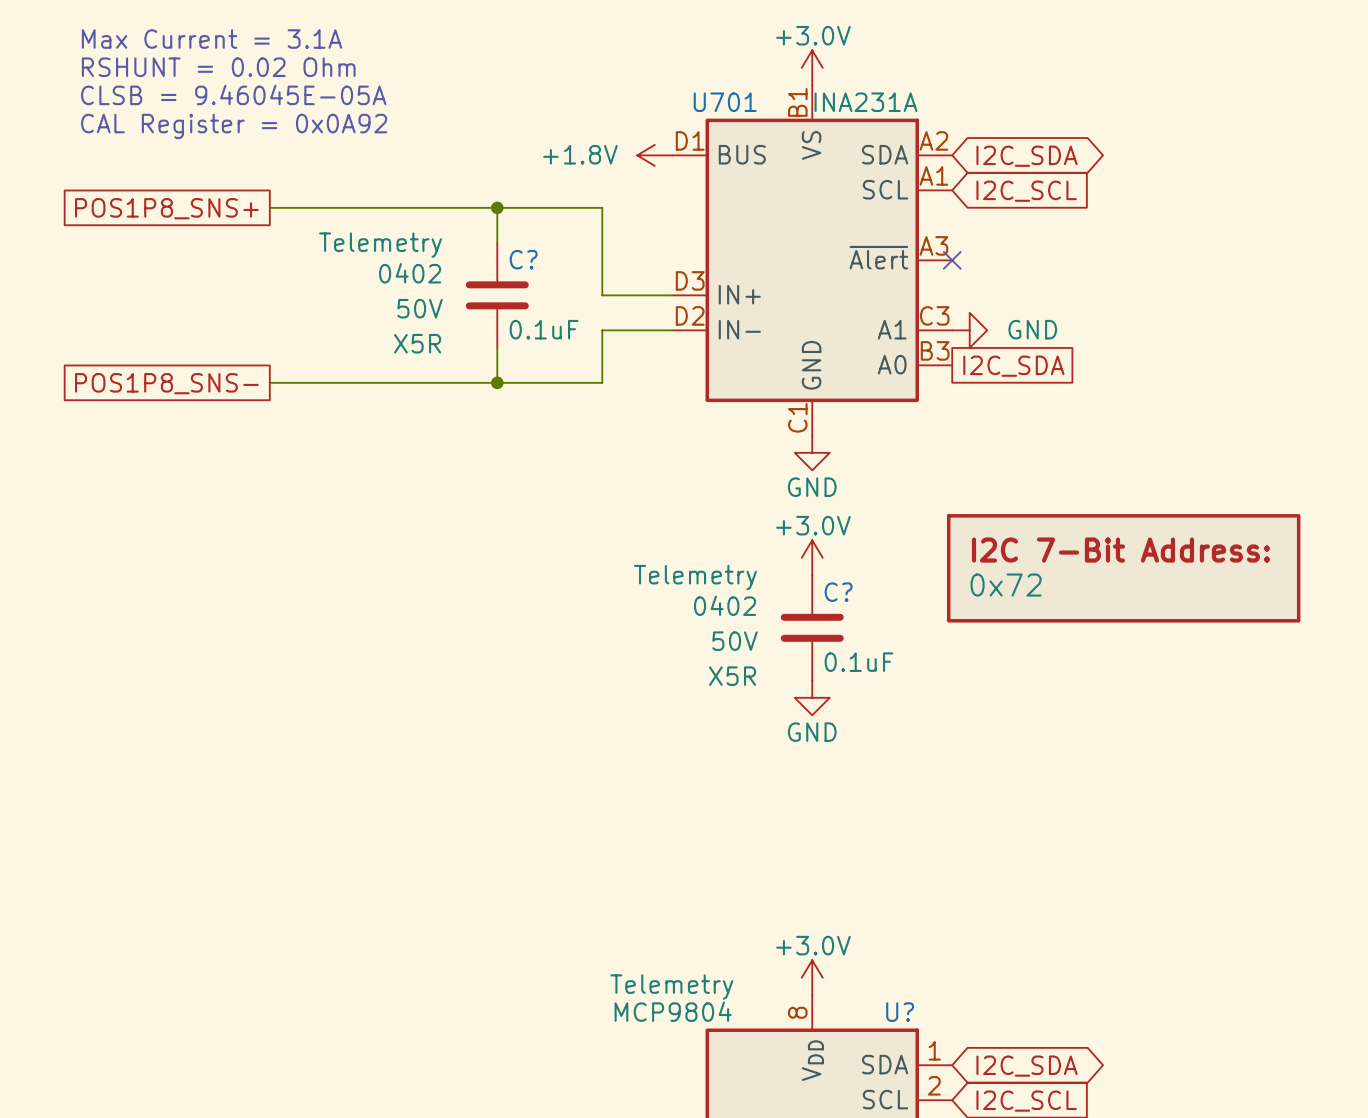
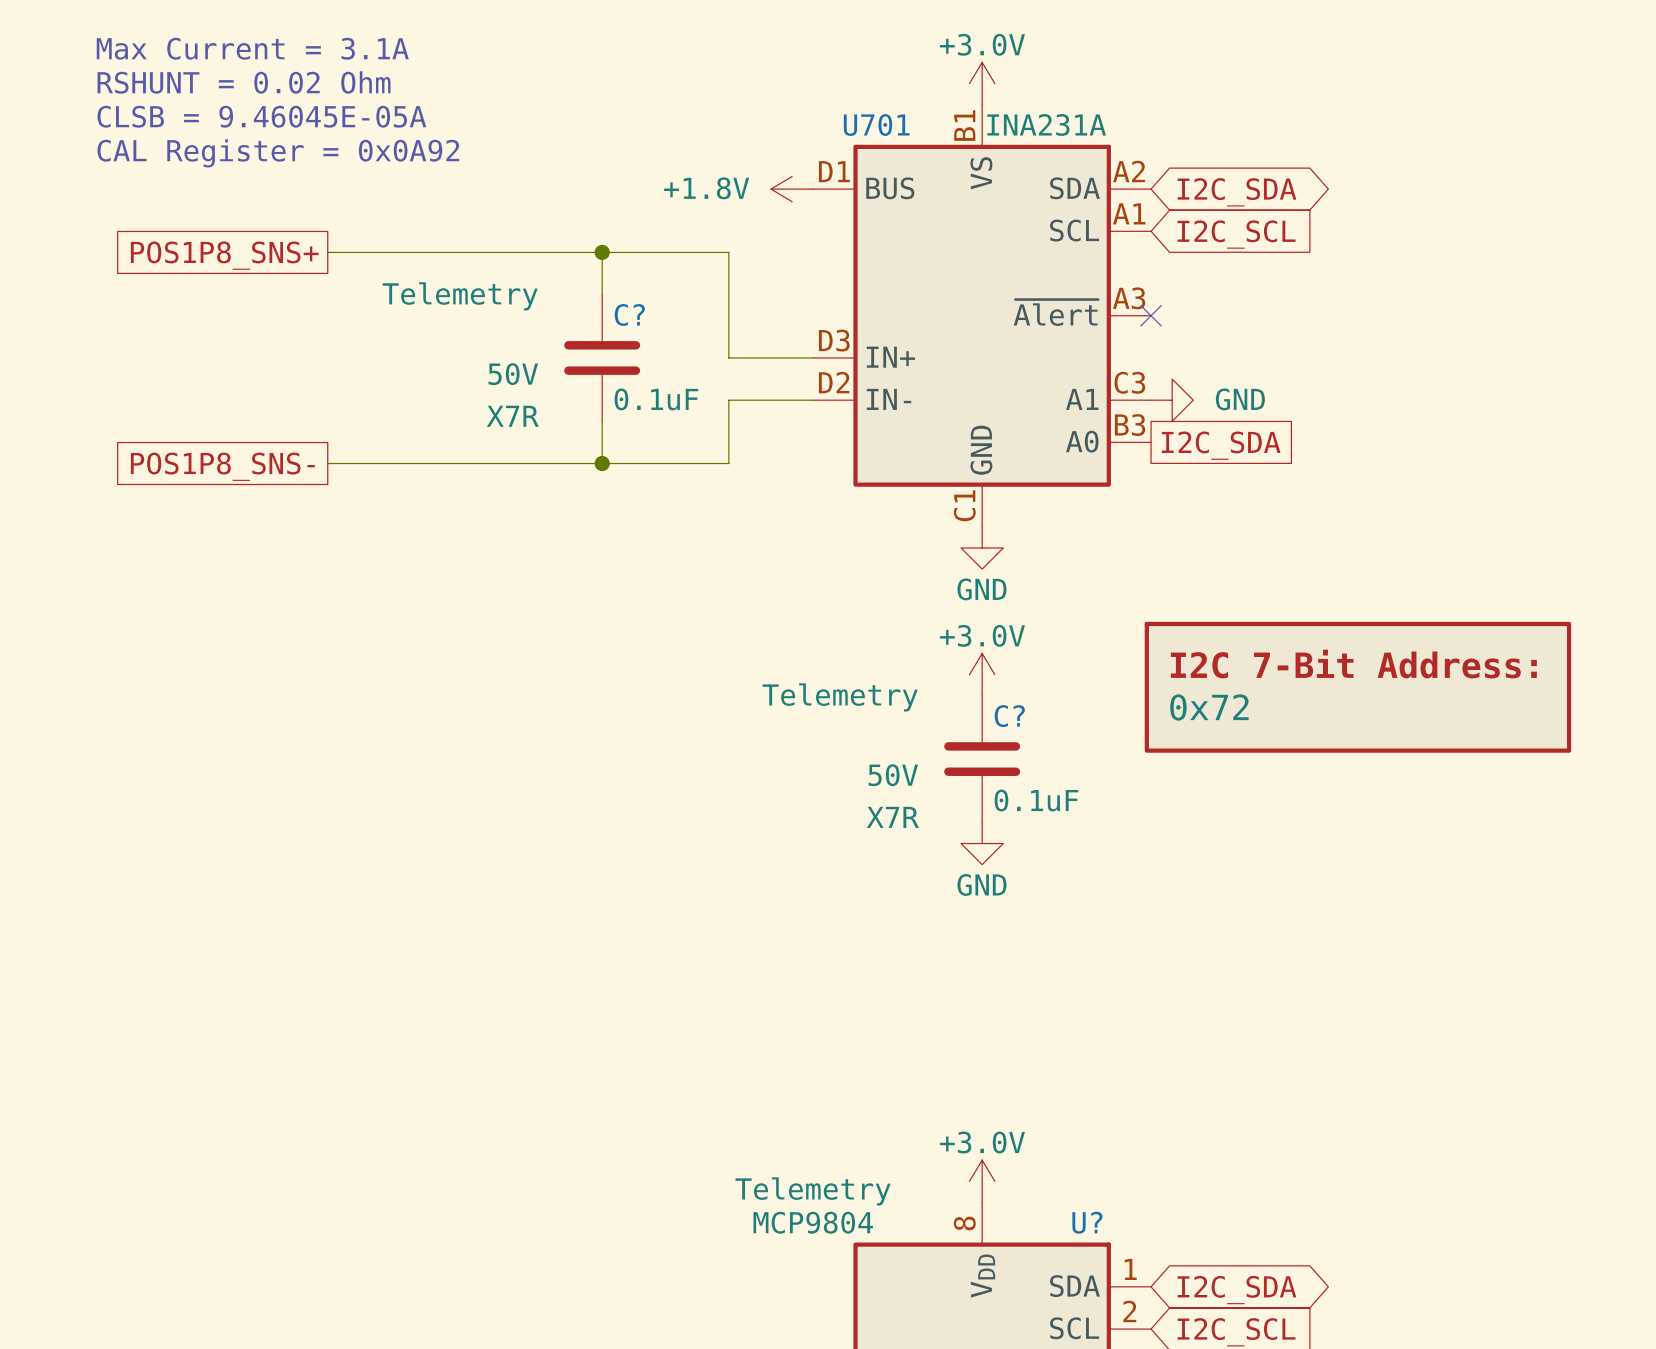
C? text: 0402 (410, 273) -> none
C? text: X5R (417, 343) -> X7R (512, 416)
C? text: 0402 (725, 605) -> none
C? text: X5R (732, 676) -> X7R (892, 817)

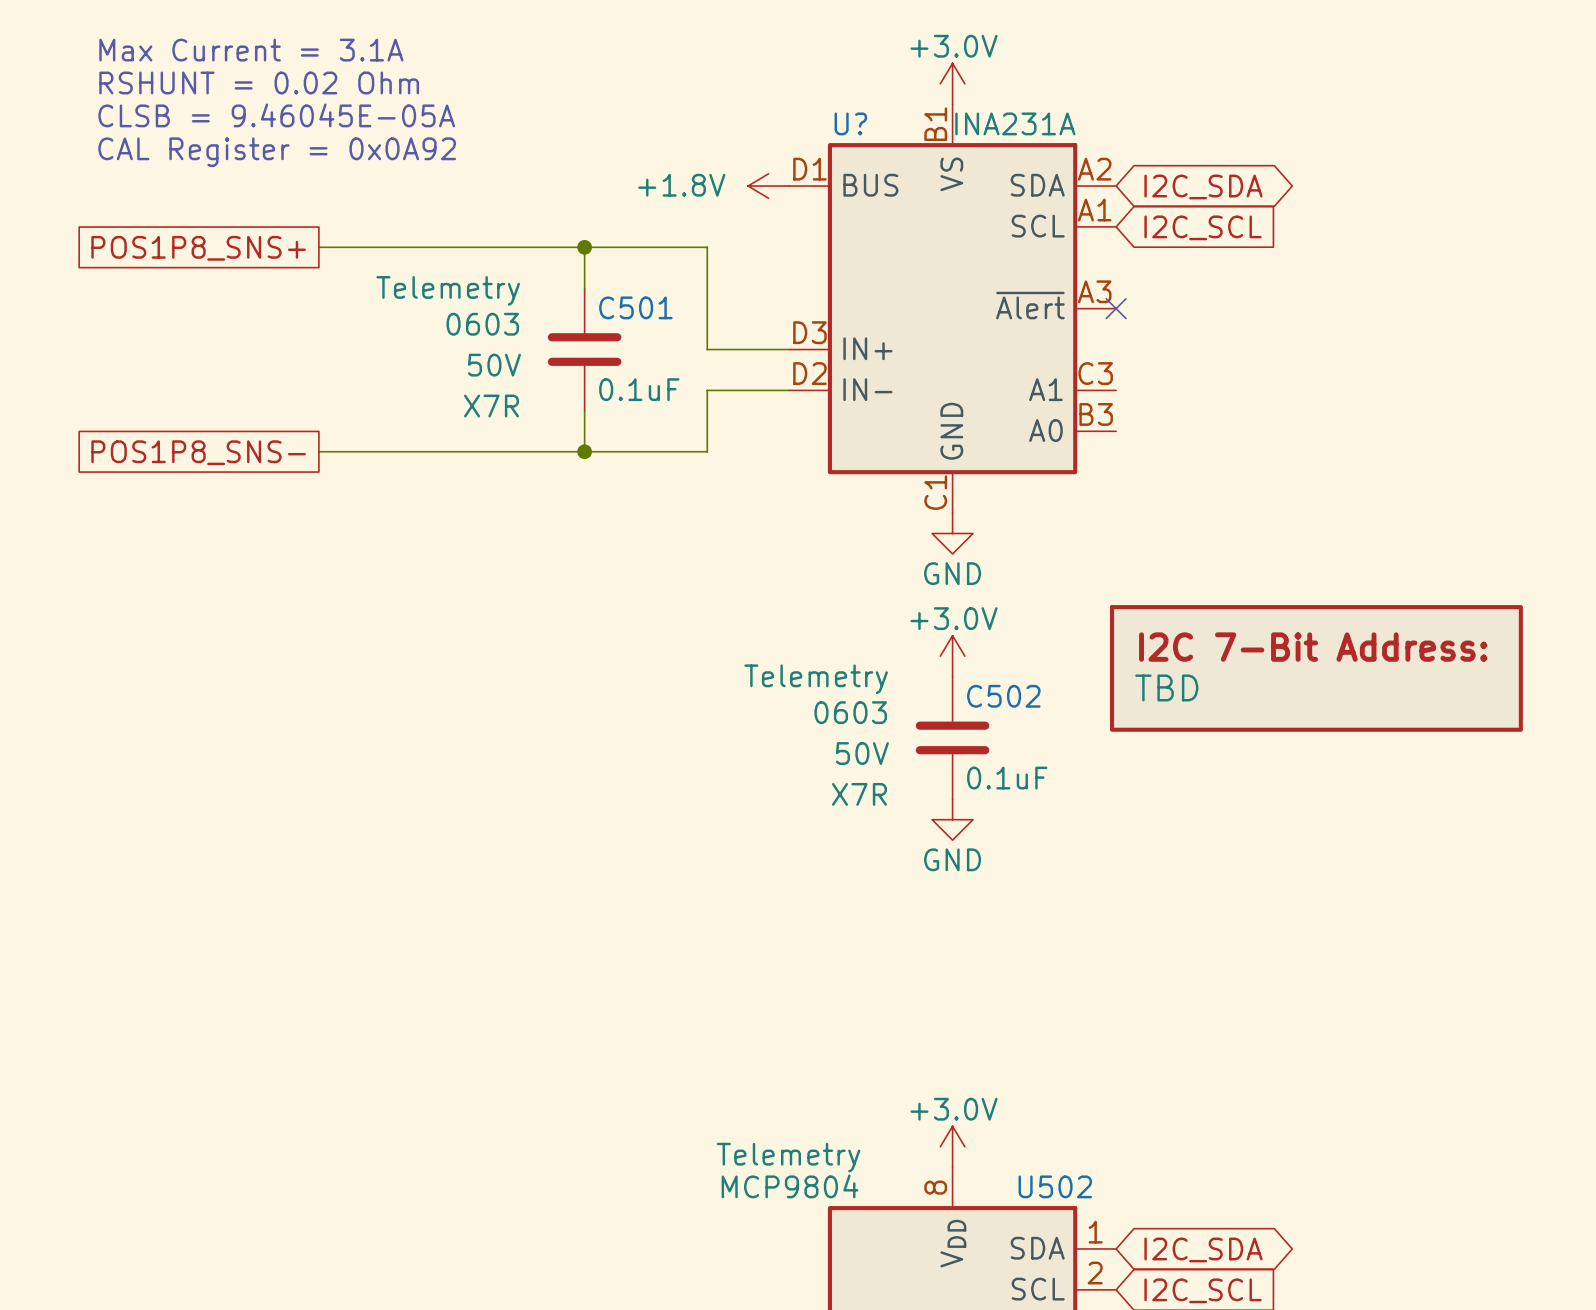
U701 name: U701 (876, 124) -> U? (850, 123)
C? name: C? (629, 314) -> C501 (635, 307)
C? text: none -> 0603 (482, 324)
power symbol: GND (1172, 400) -> none
global label: I2C_SDA (1221, 445) -> none
part value: 0x72 (1209, 707) -> TBD (1166, 687)
C? name: C? (1009, 716) -> C502 (1003, 696)
C? text: none -> 0603 (850, 712)
U? name: U? (1087, 1222) -> U502 (1055, 1186)

